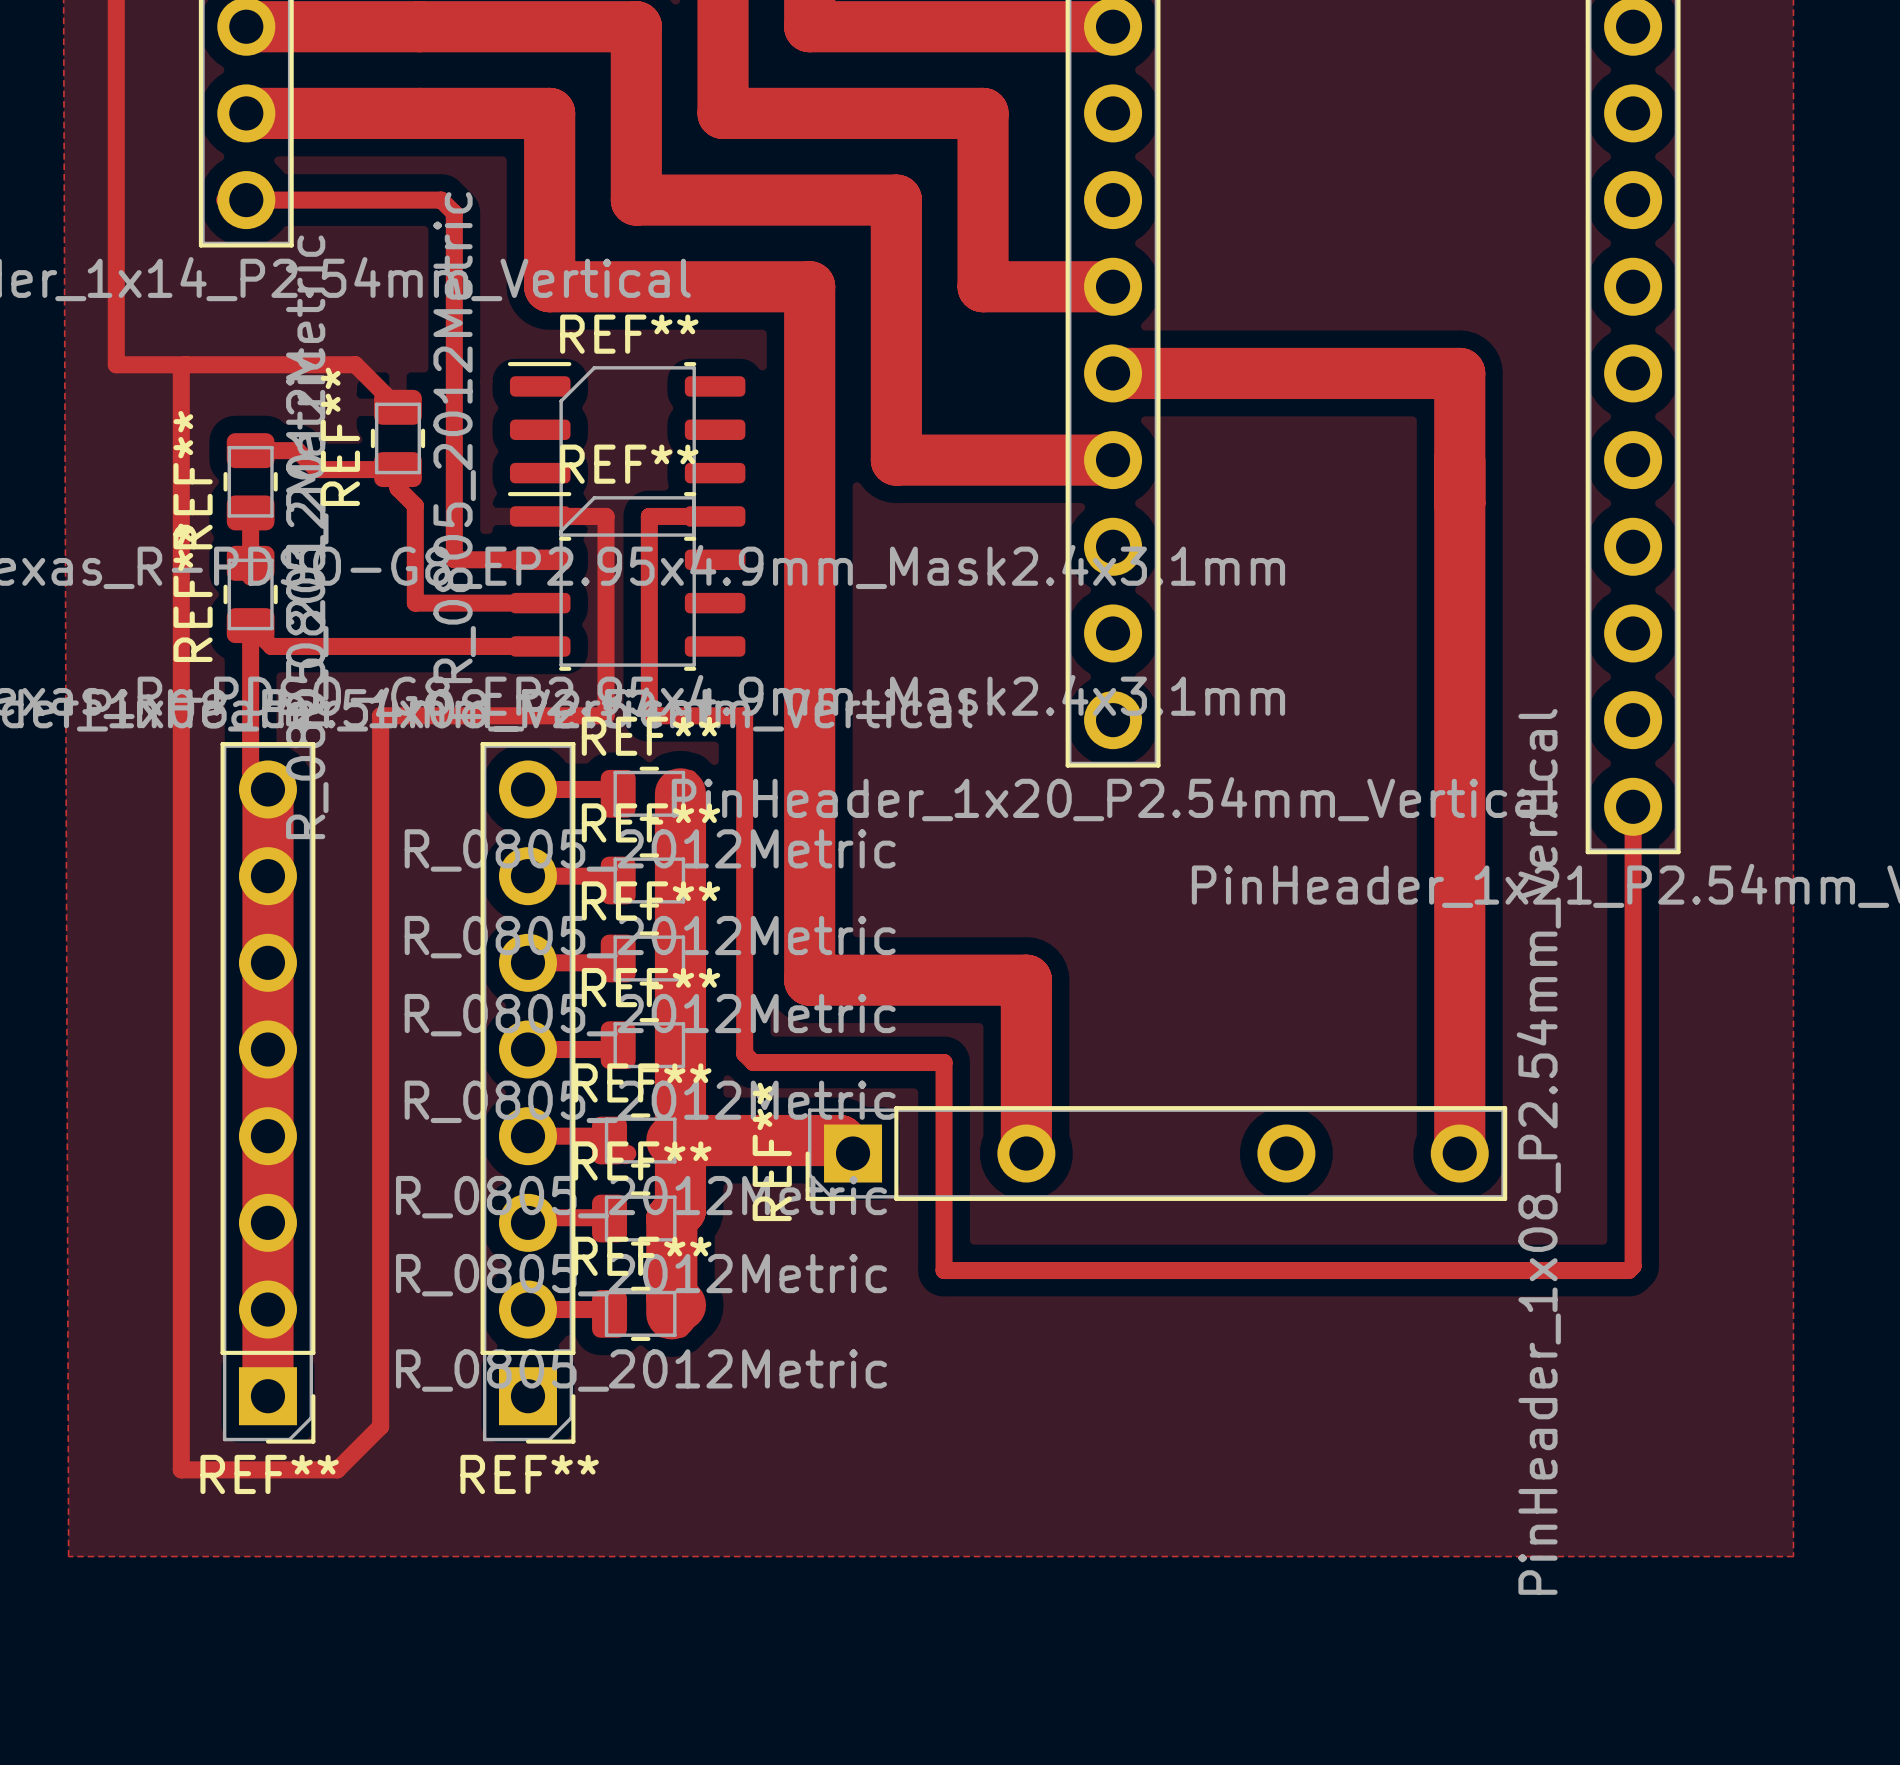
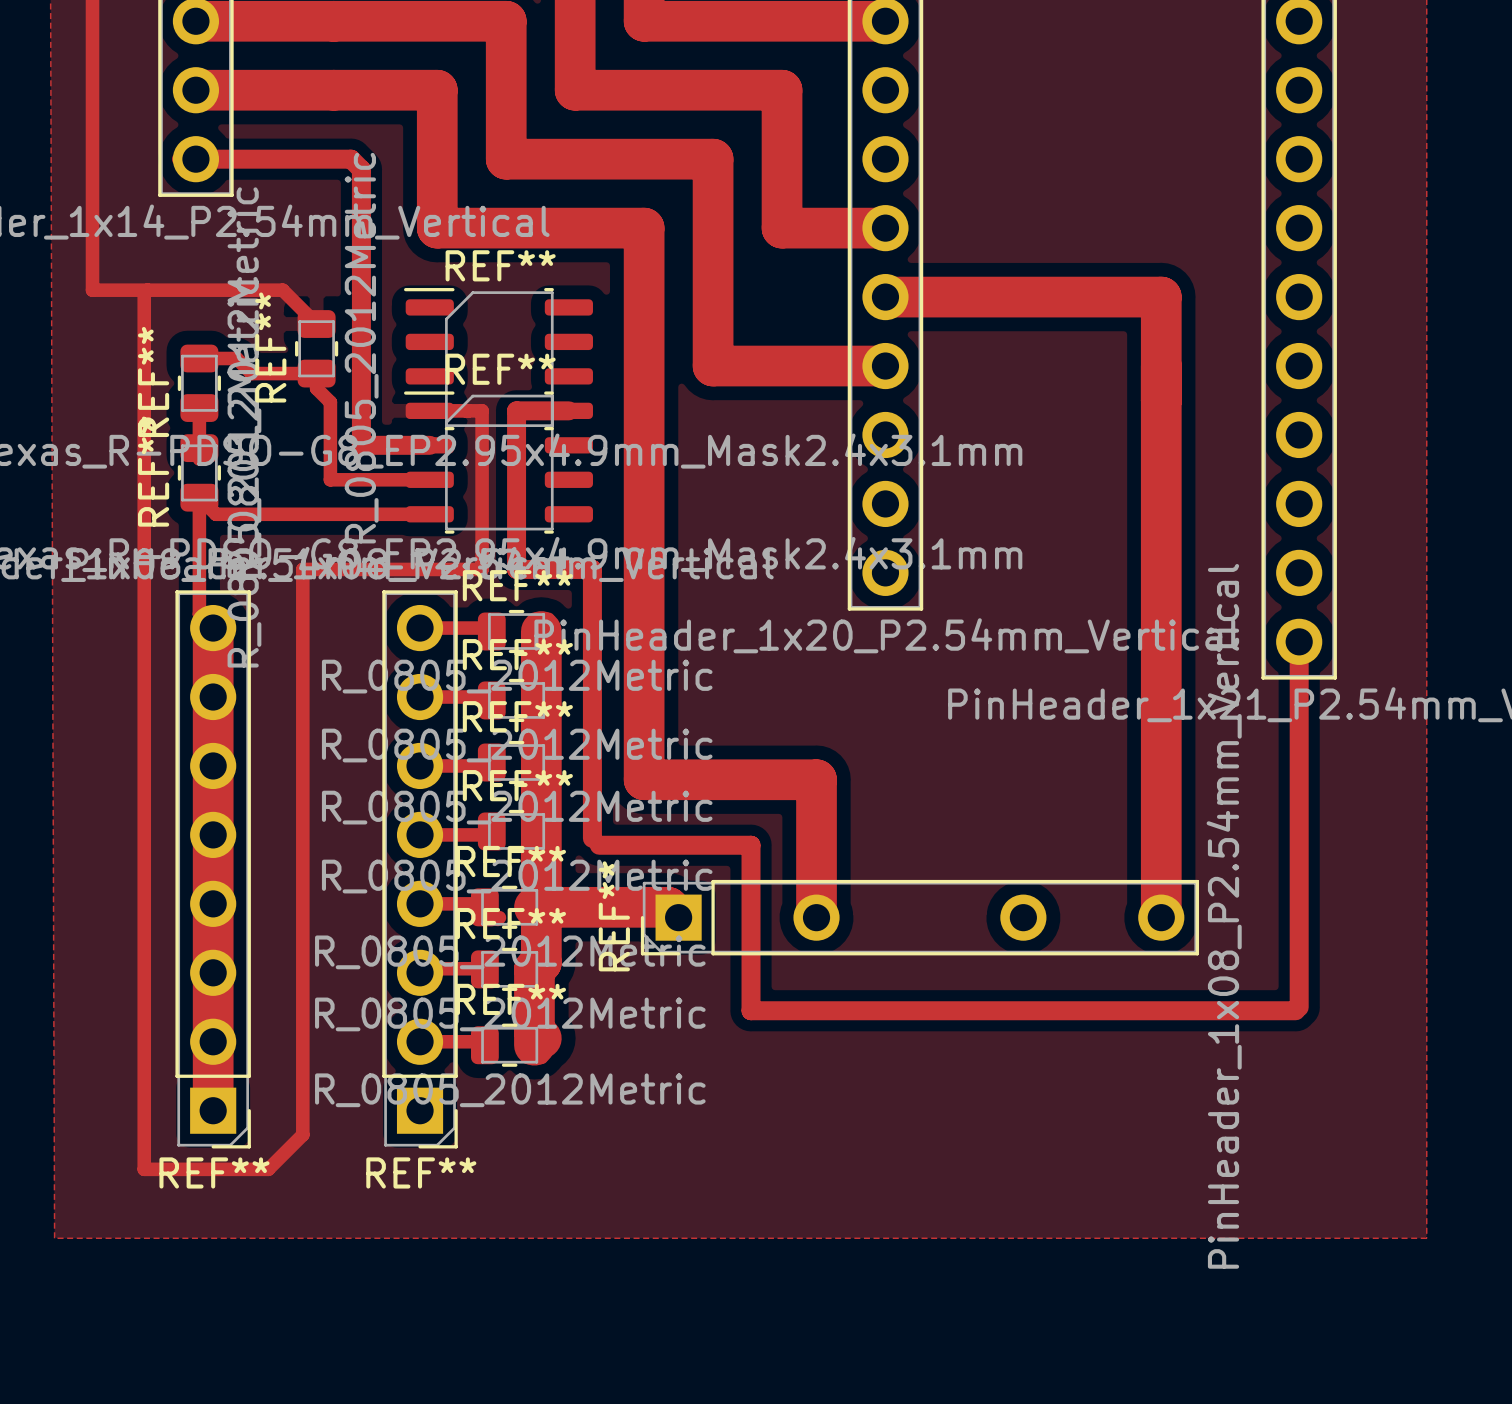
top track width: thin (246, 200) (441, 200) (454, 213) (454, 559) (540, 559) -> thick (195, 159) (351, 159) (361, 169) (361, 445) (429, 445)
top track width: thin (715, 516) (649, 516) (649, 715) (744, 715) (744, 1053) -> thick (568, 410) (516, 410) (516, 569) (592, 569) (592, 838)
top track width: thin (1633, 806) (1633, 1266) -> thick (1299, 641) (1299, 1007)
top track width: thin (753, 1062) (944, 1062) (944, 1270) (1628, 1270) -> thick (599, 845) (751, 845) (751, 1010) (1295, 1010)

